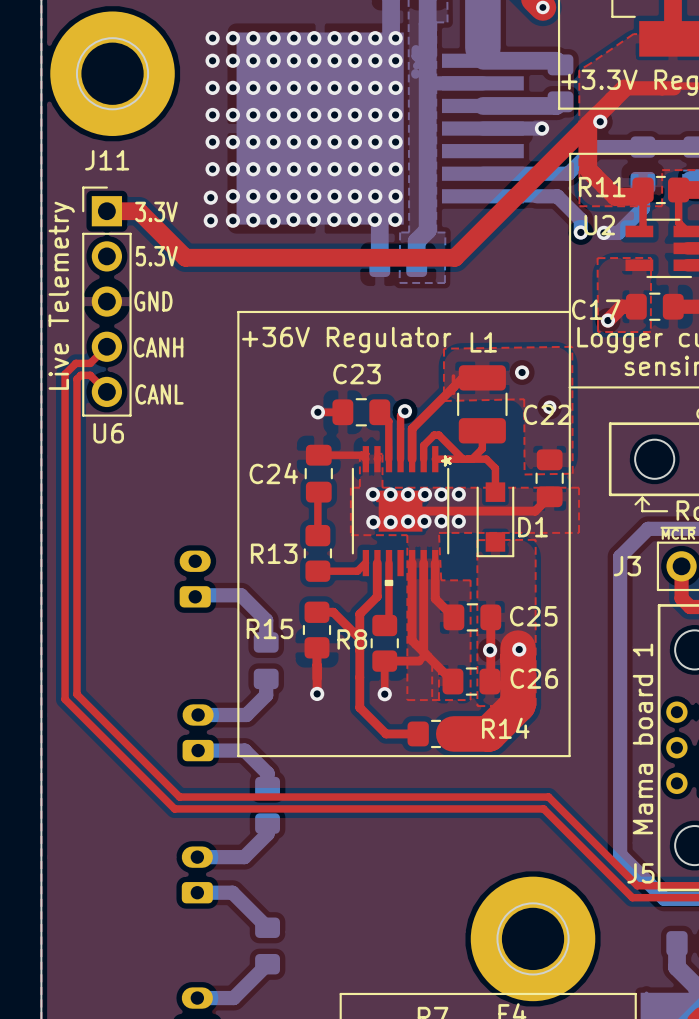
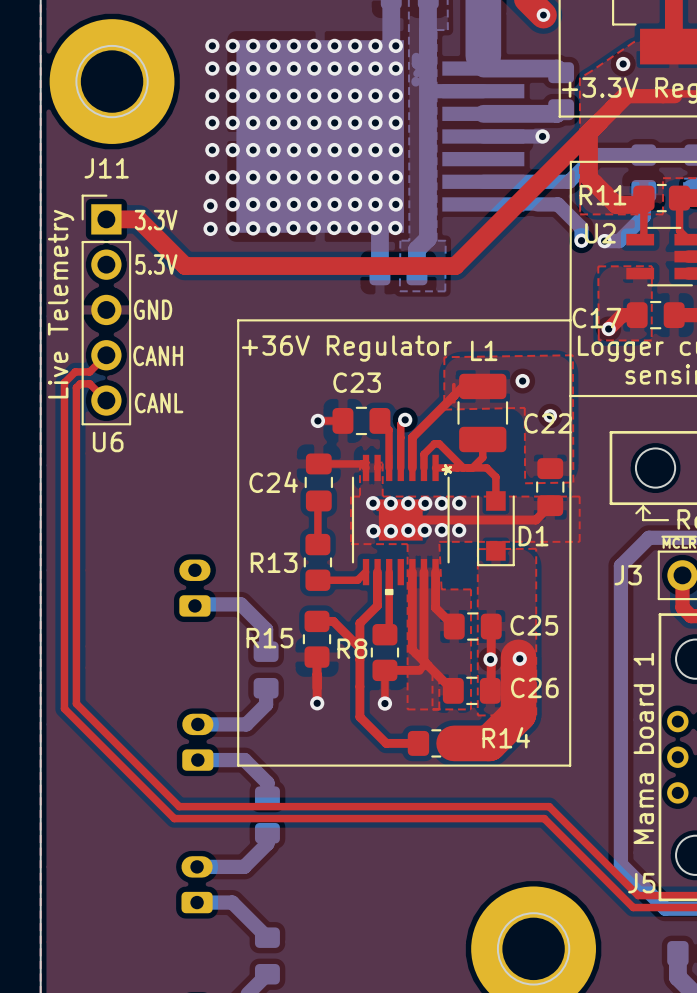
via: none -> (623, 64)
via: (600, 121) -> none

